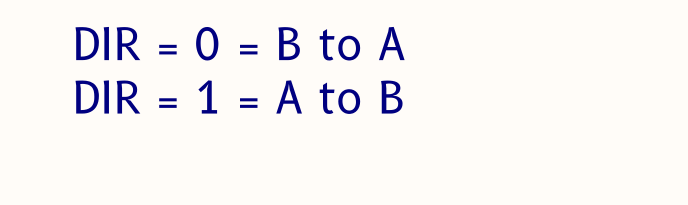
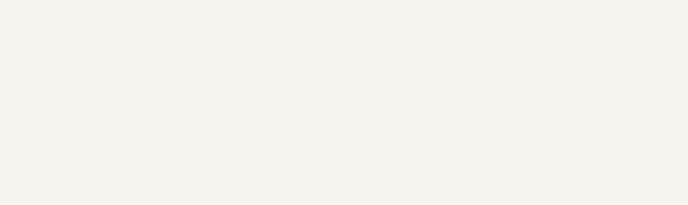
text: DIR = 0 = B to A (240, 43) -> none
text: DIR = 1 = A to B (239, 97) -> none

